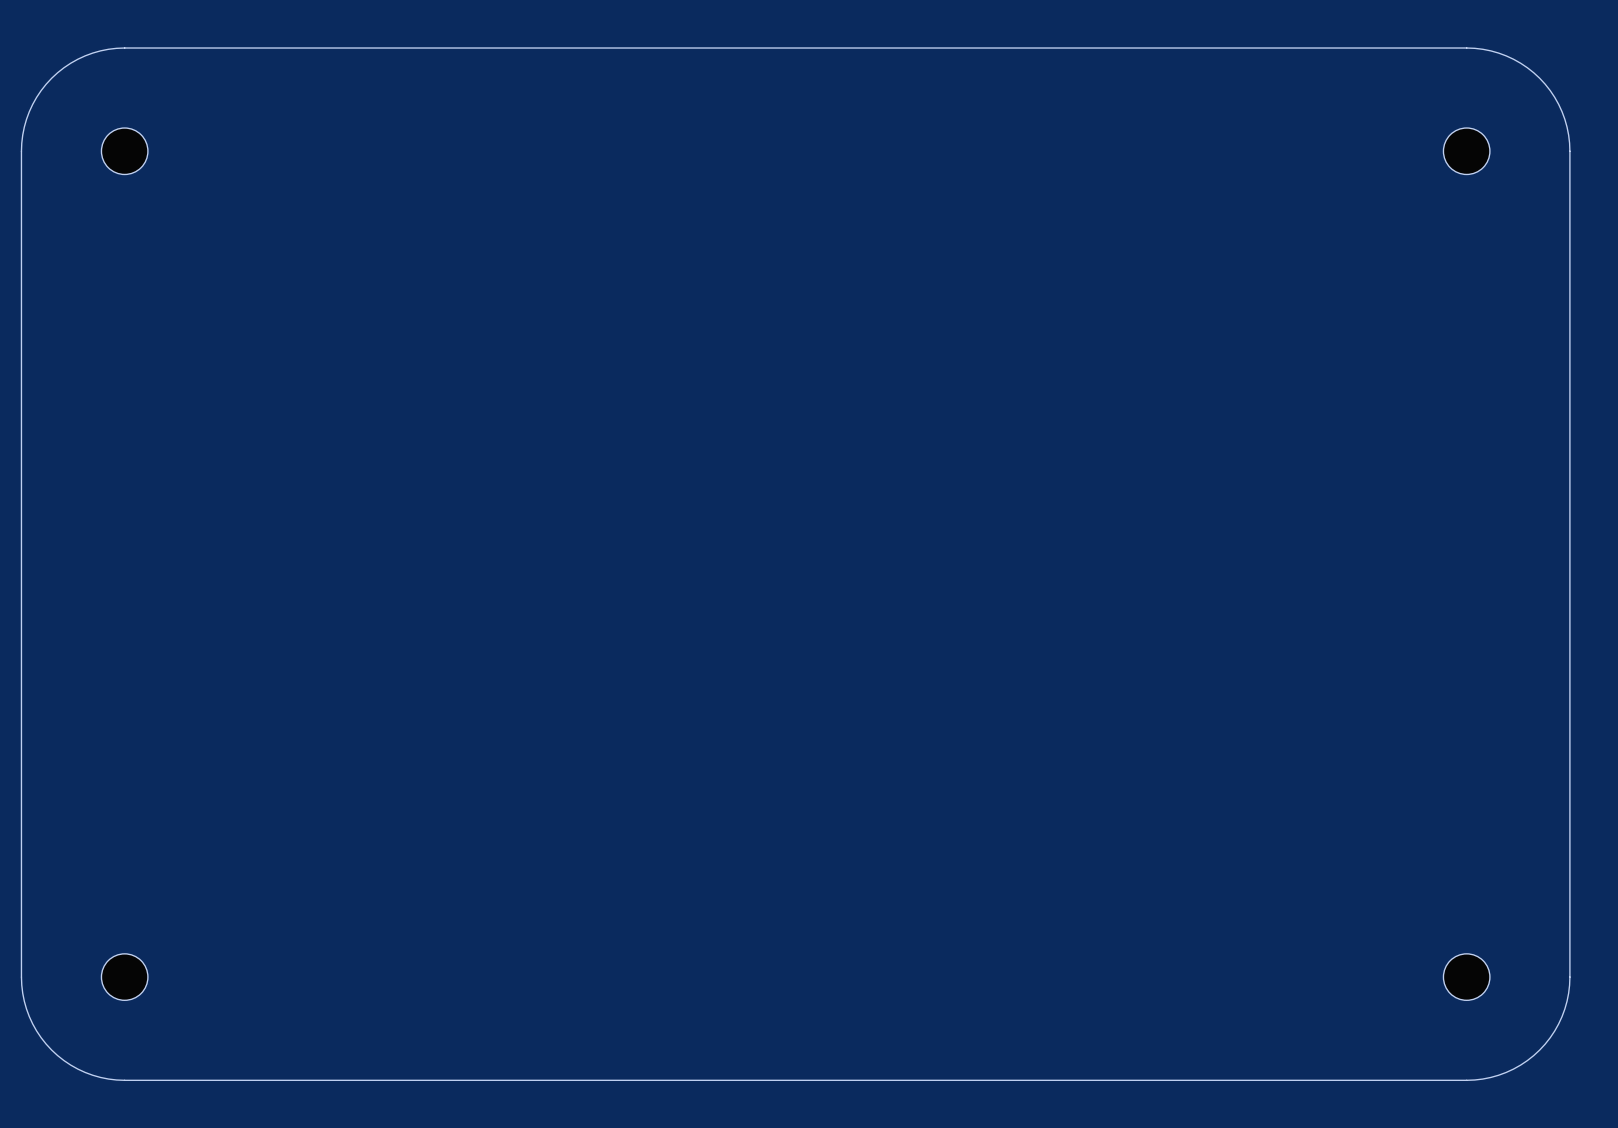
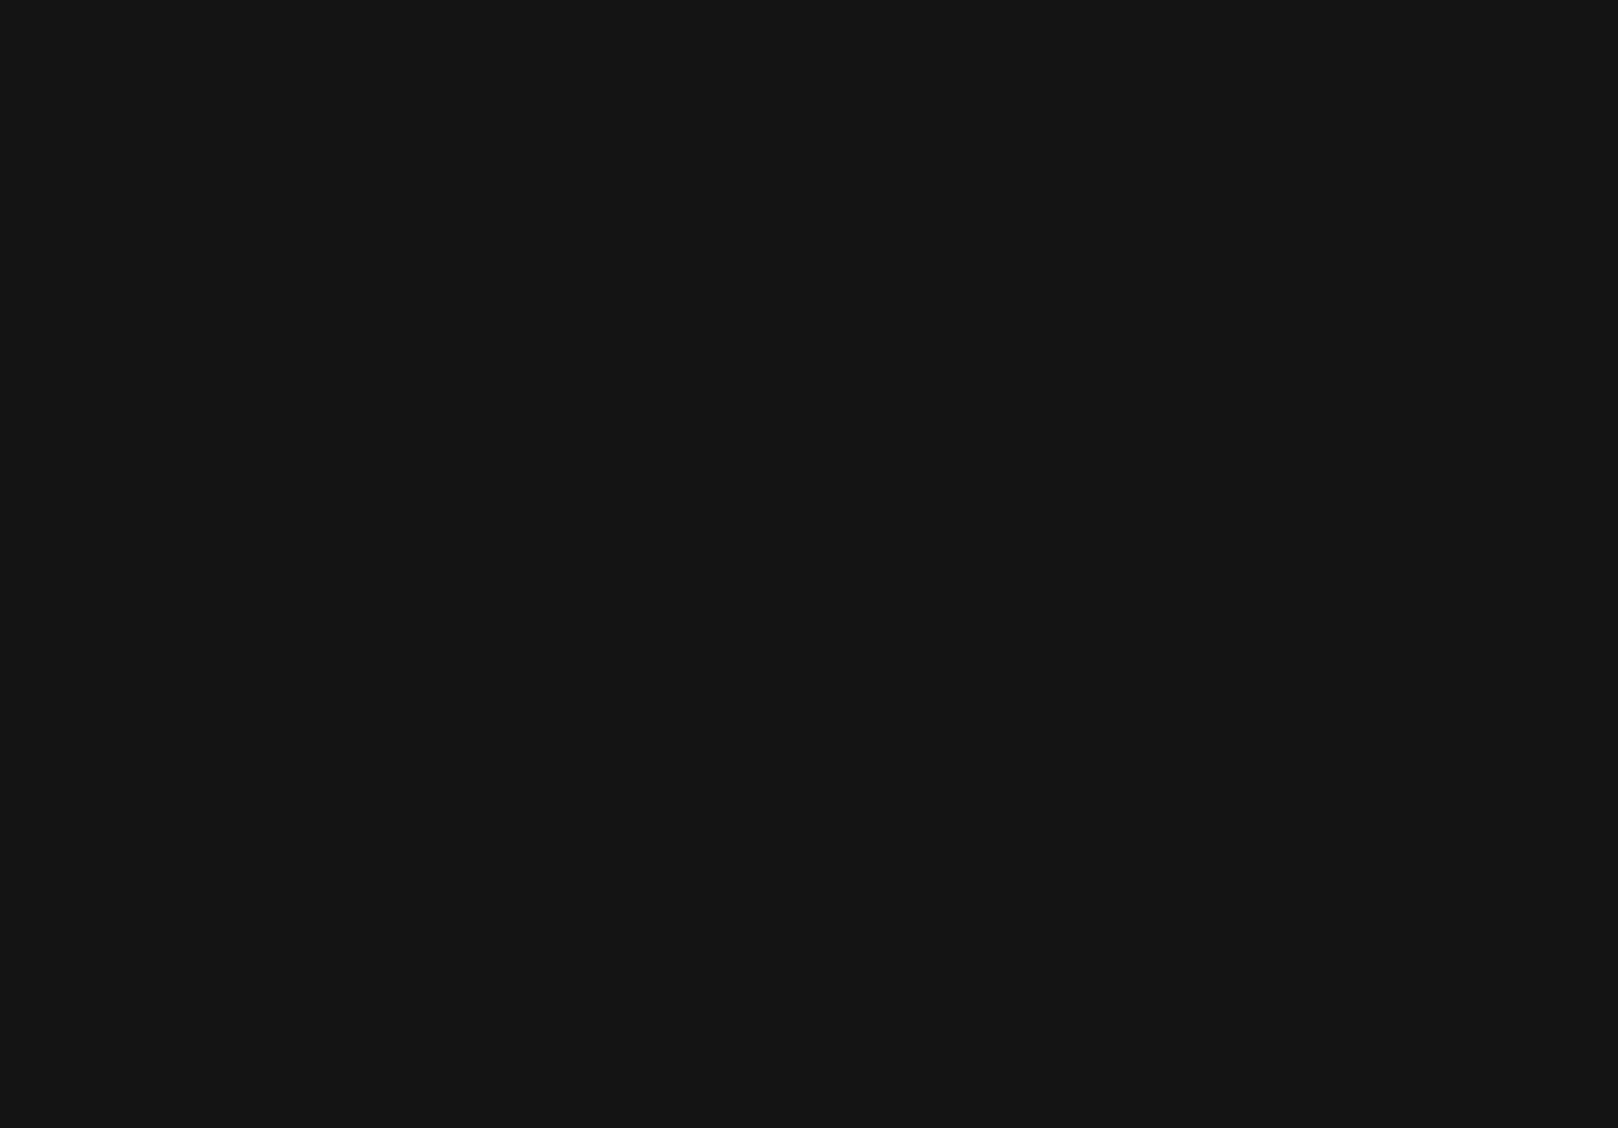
board edge: (1466, 48) (124, 48) (92, 53) (64, 67) (46, 84) (32, 104) (24, 127) (21, 151) (21, 977) (26, 1008) (41, 1037) (57, 1055) (77, 1069) (100, 1077) (124, 1080) (1466, 1080) (1498, 1075) (1527, 1060) (1545, 1044) (1558, 1023) (1564, 1008) (1569, 985) (1569, 143) (1567, 127) (1558, 104) (1545, 84) (1533, 72) (1513, 59) (1498, 53) (1466, 48) -> none
part: (124, 151) -> none
part: (1466, 151) -> none
part: (124, 977) -> none
part: (1466, 977) -> none

